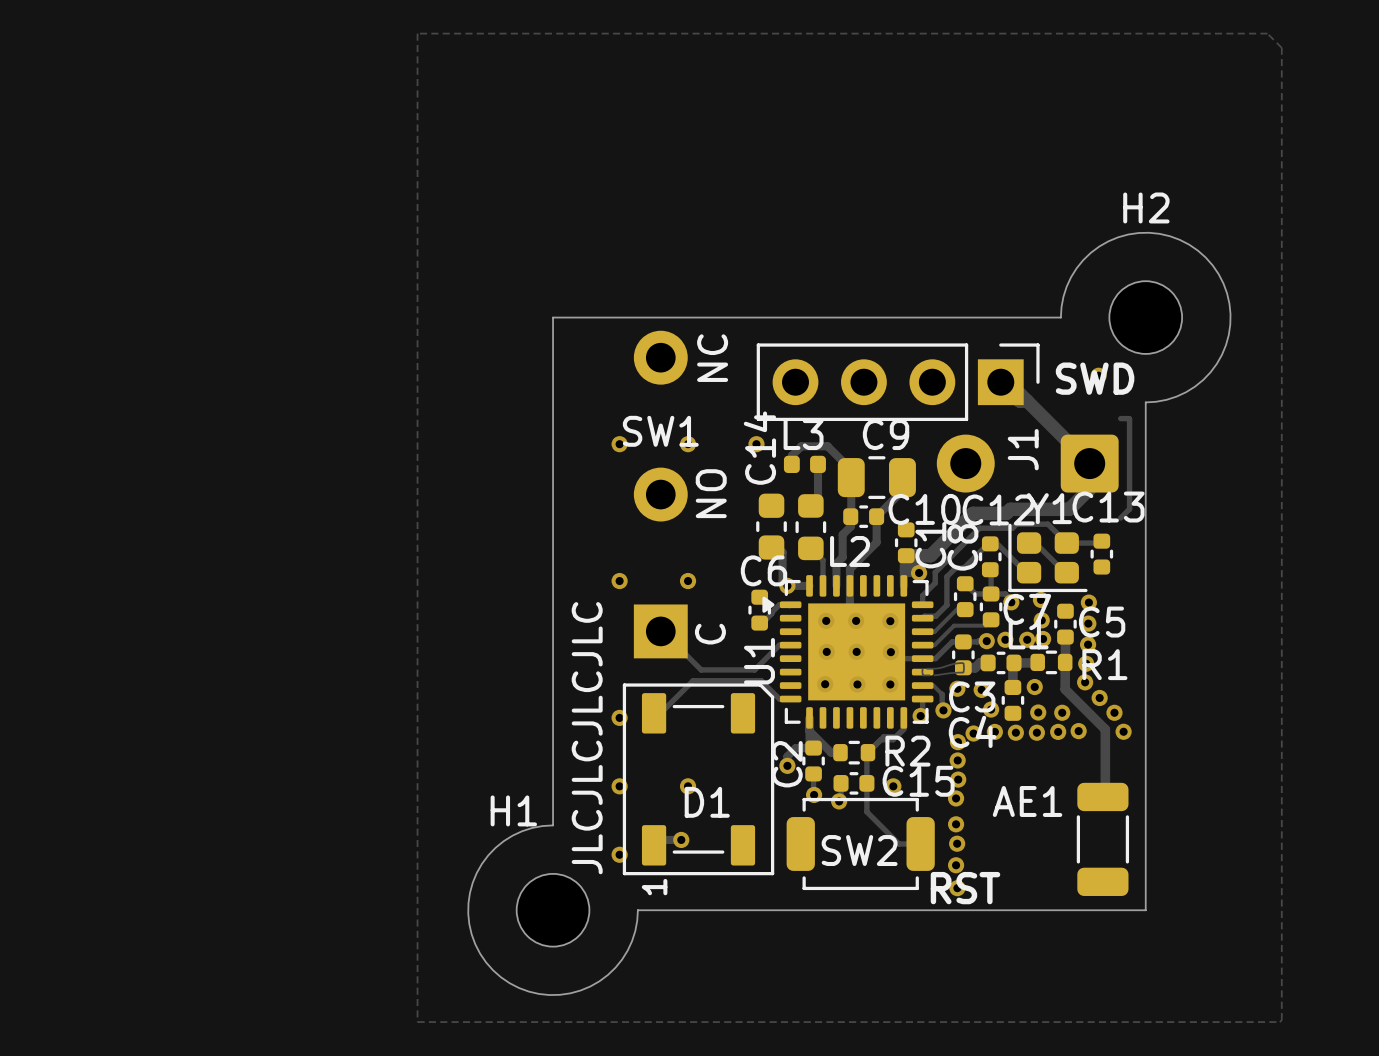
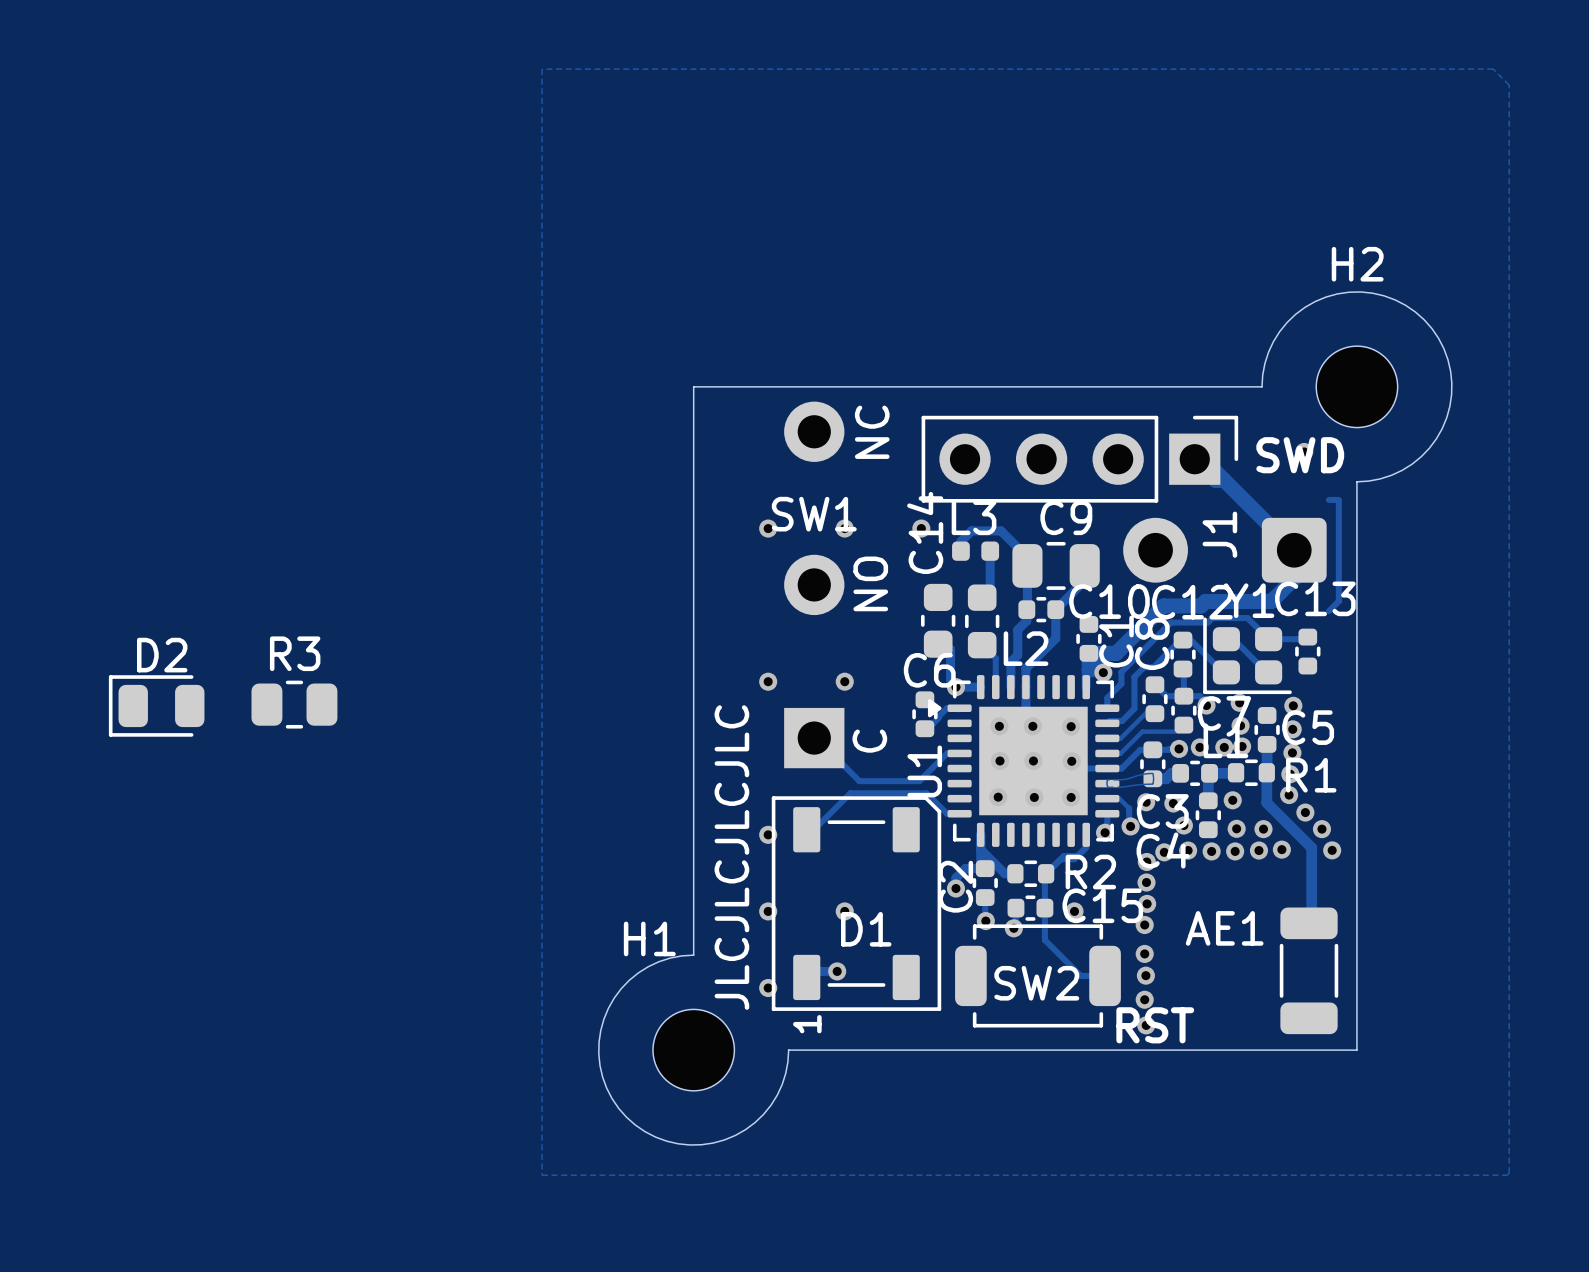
R3: none -> (294, 704)
D2: none -> (156, 705)

